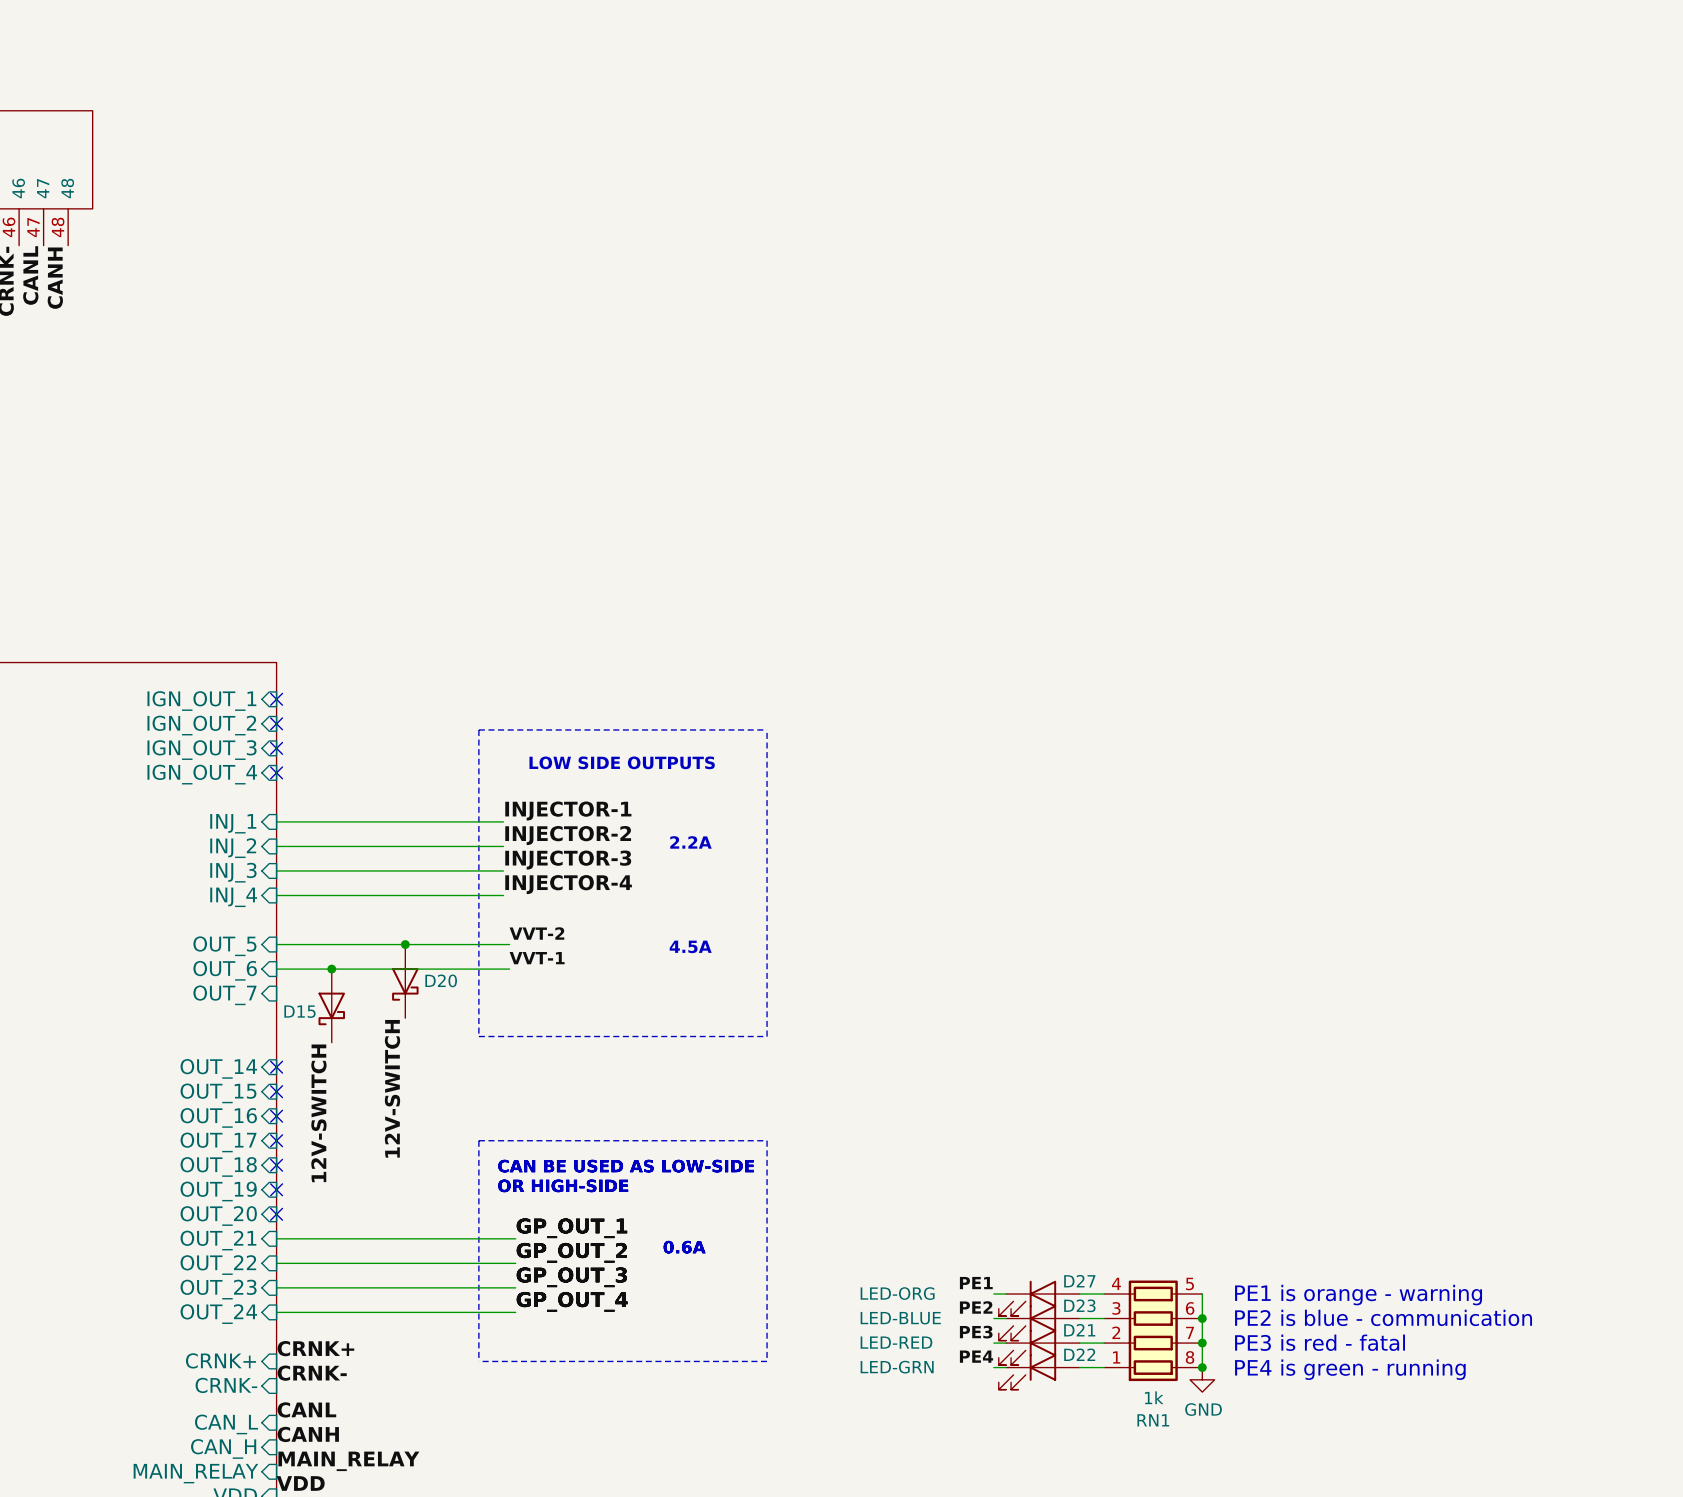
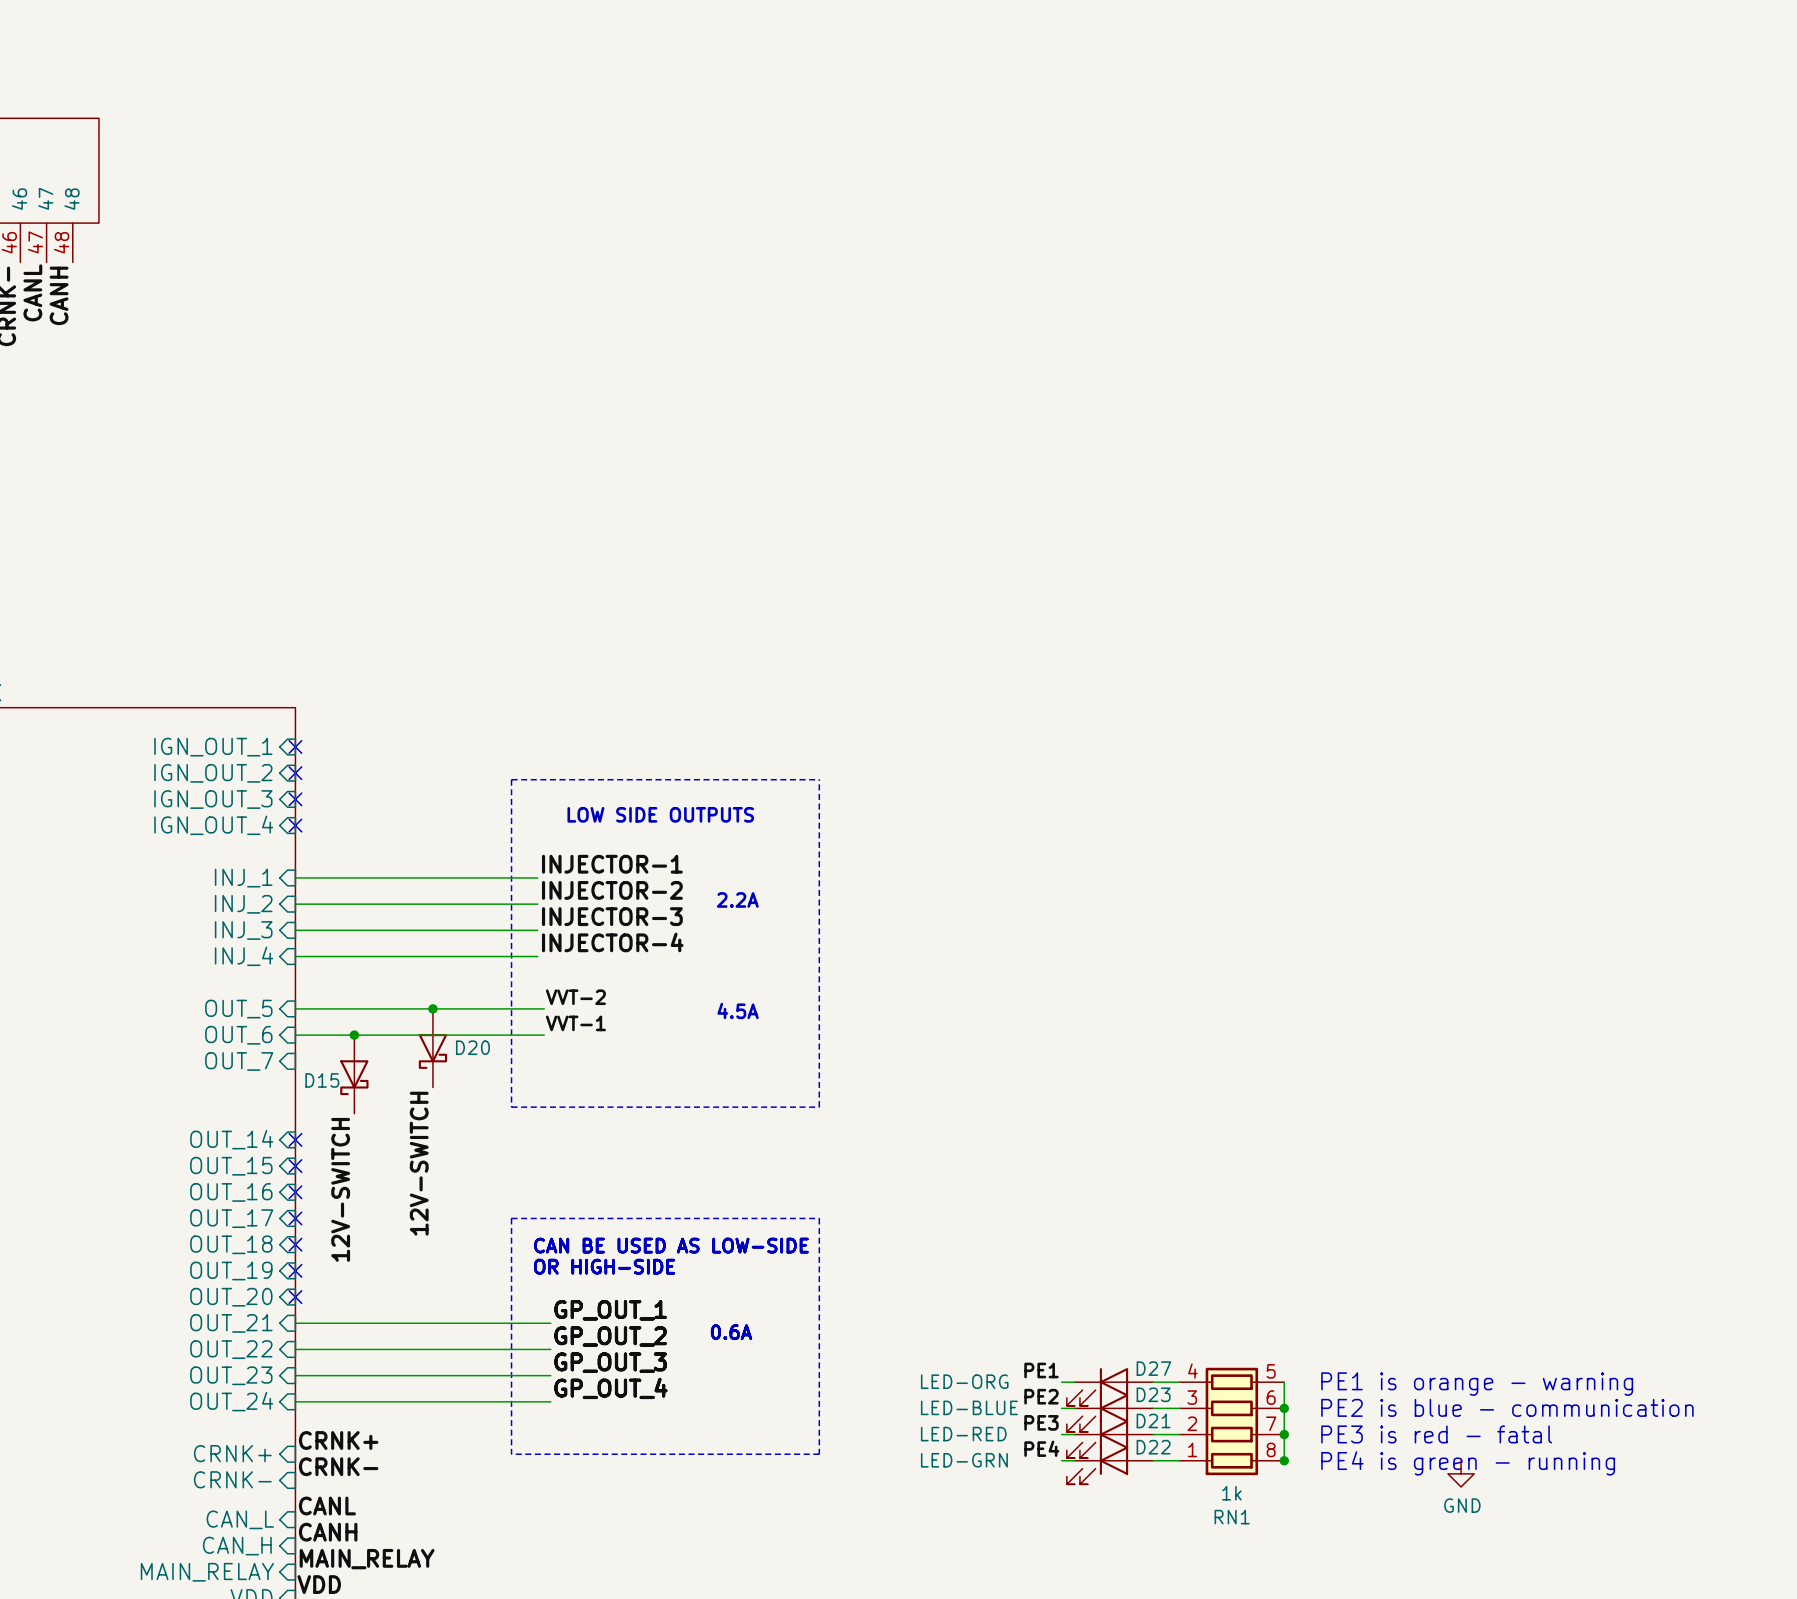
power symbol position: GND (1202, 1379) -> GND (1461, 1473)

